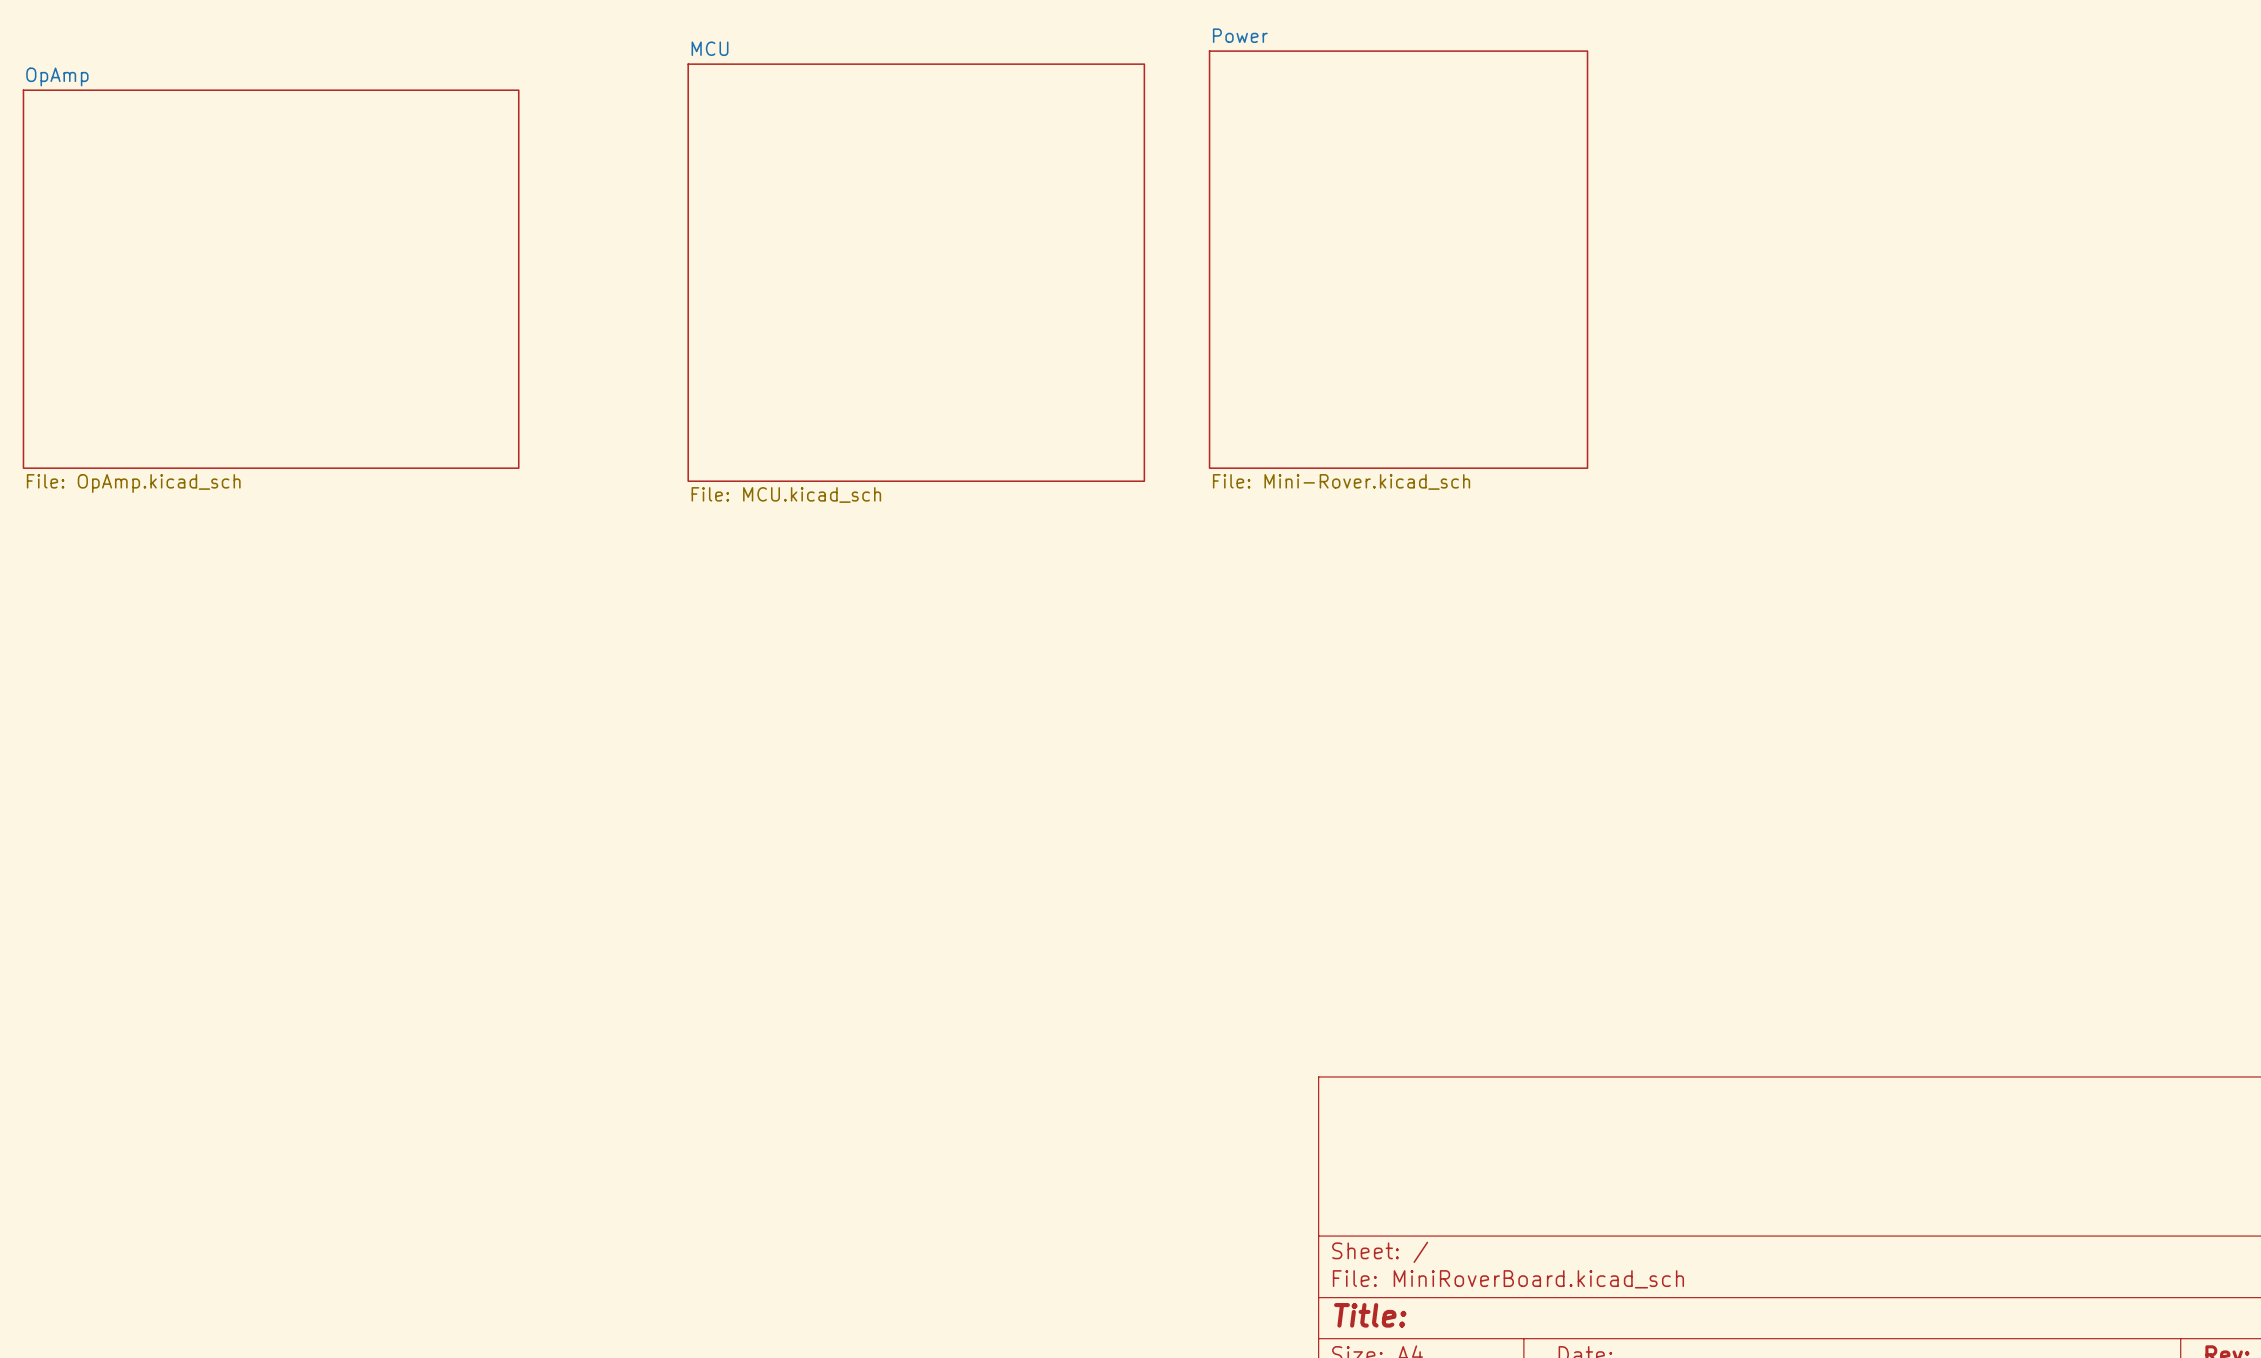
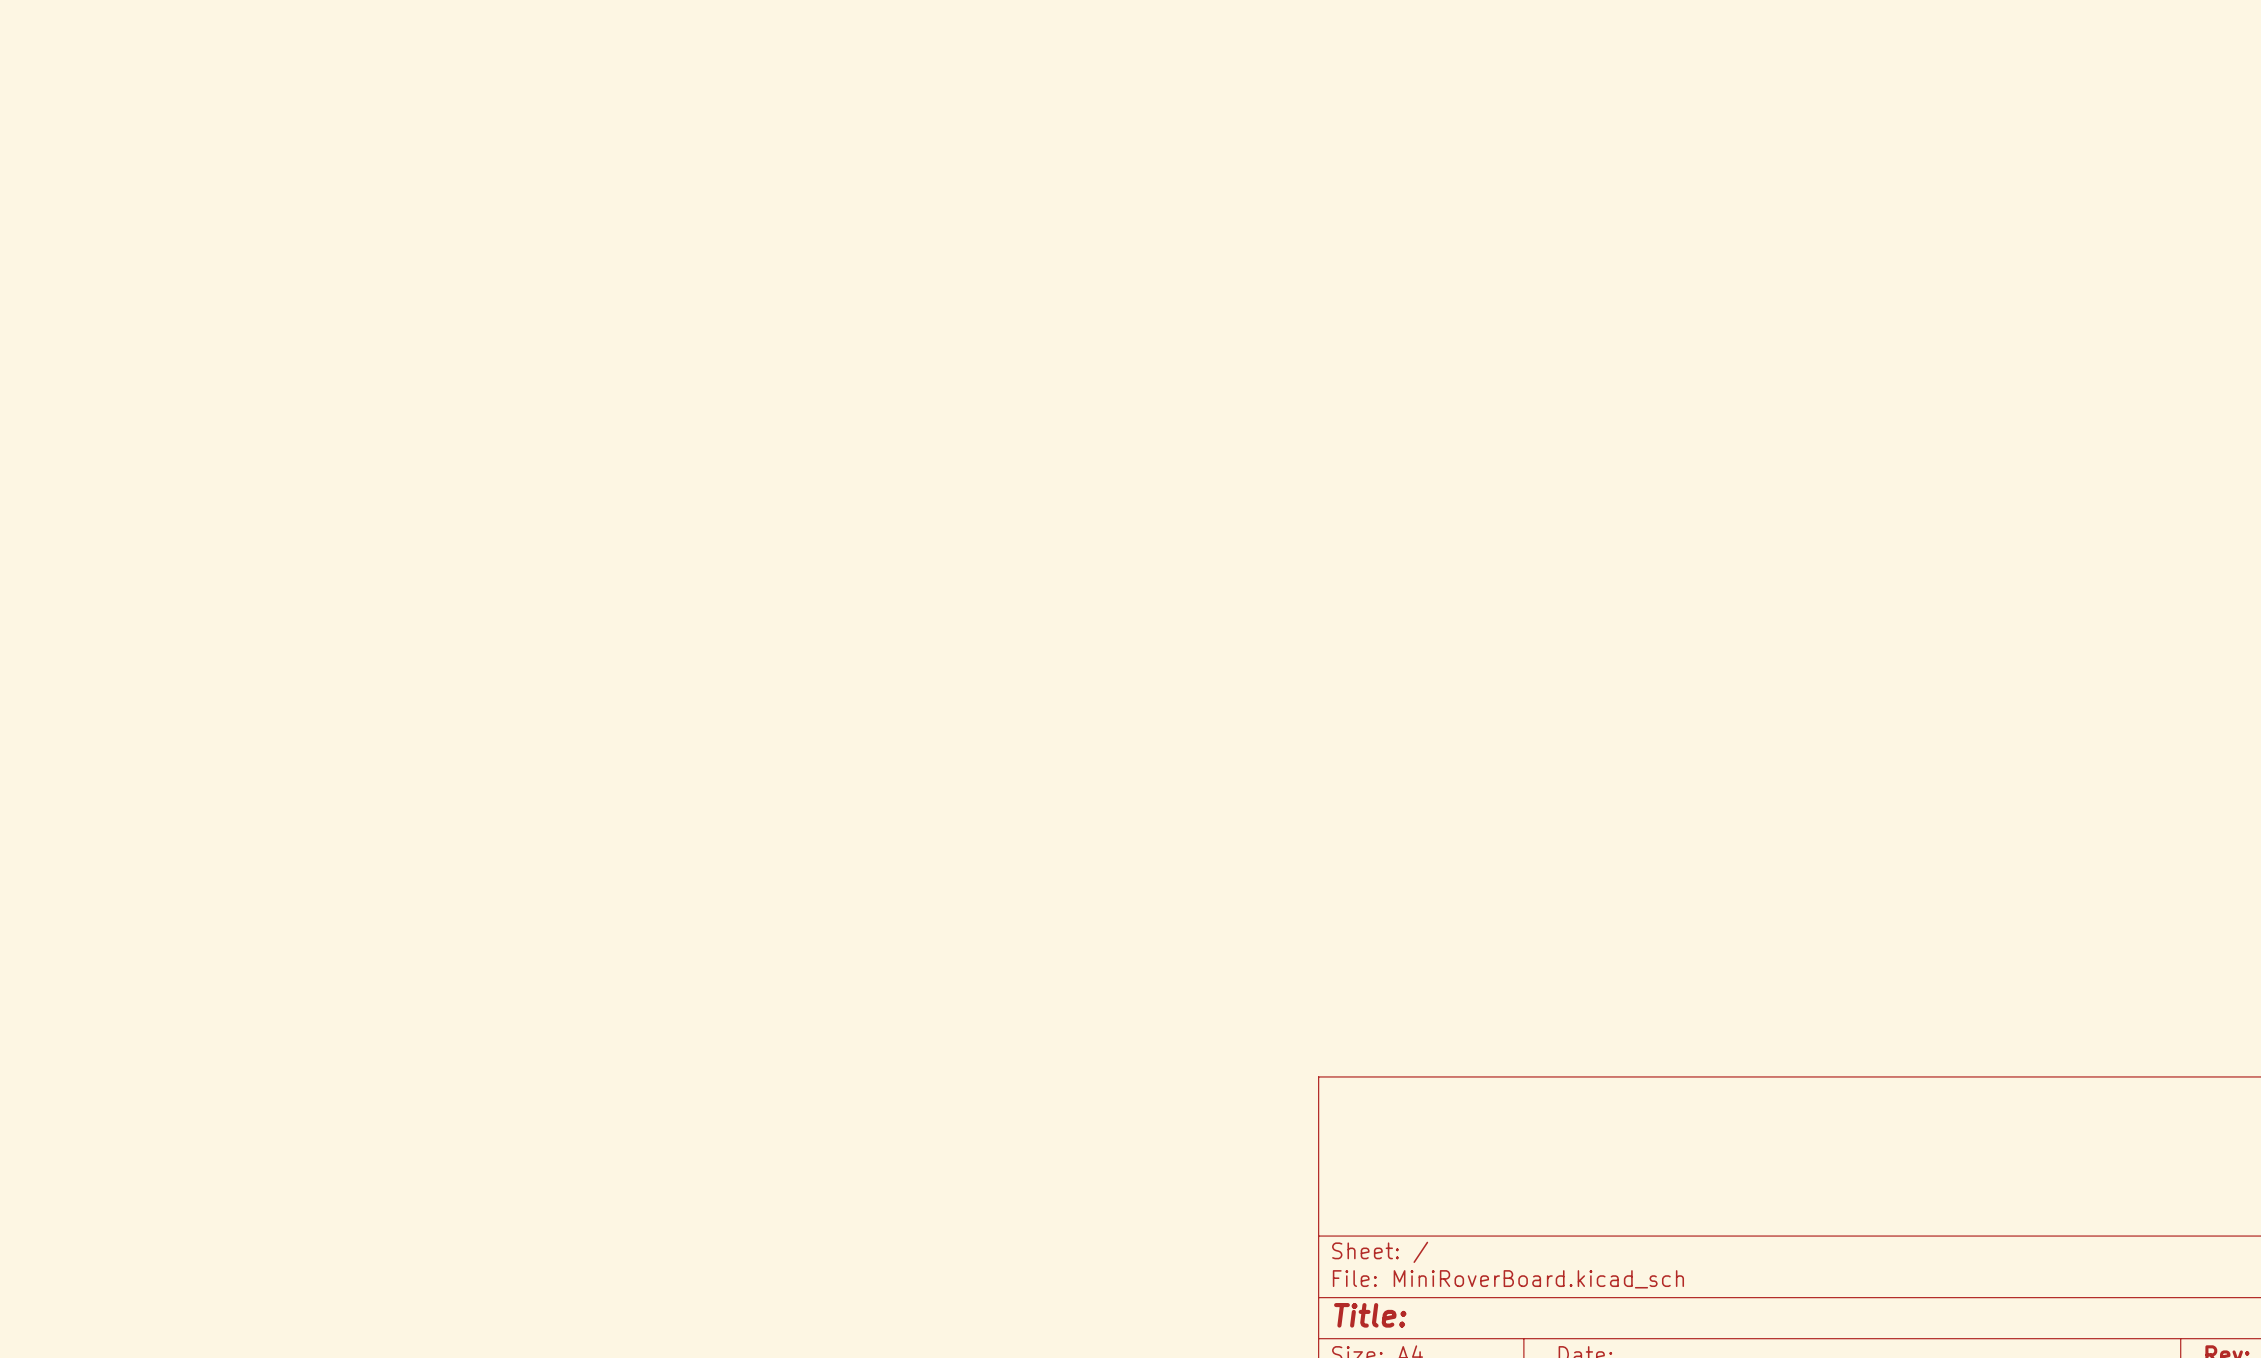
sheet Power: File: Mini-Rover.kicad_sch (1398, 259) -> none
sheet MCU: File: MCU.kicad_sch (916, 272) -> none
sheet OpAmp: File: OpAmp.kicad_sch (271, 279) -> none

